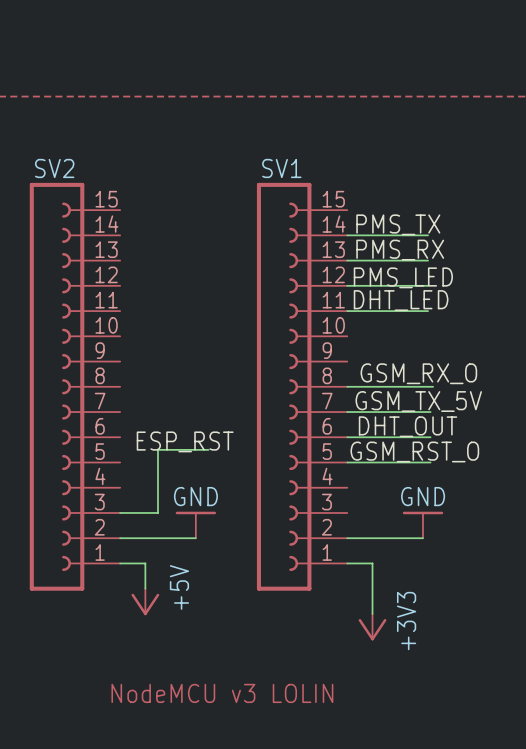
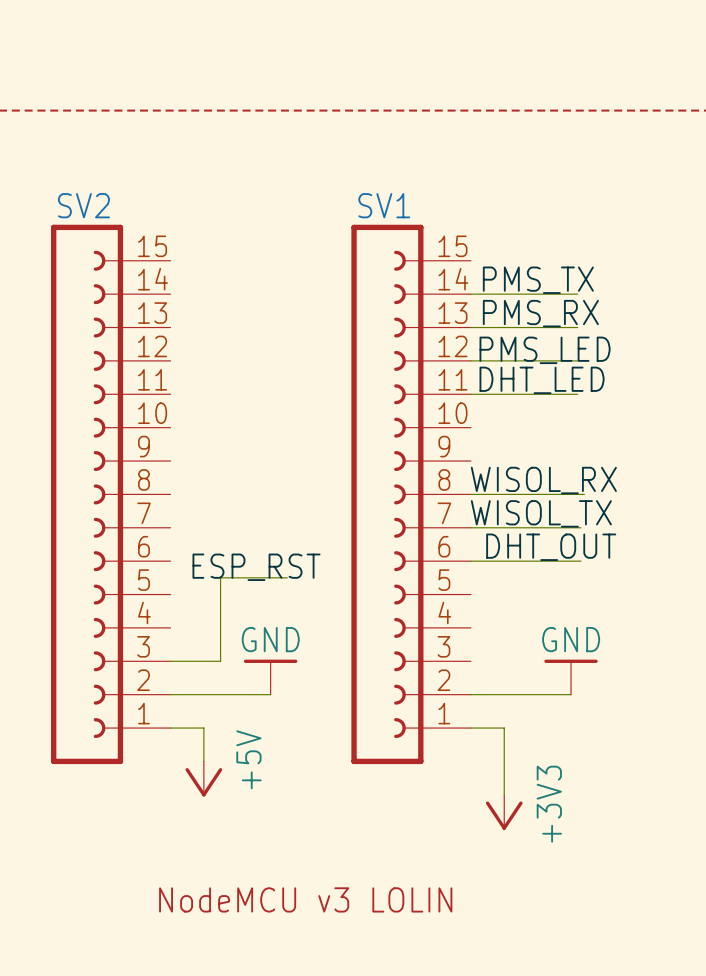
label: GSM_RX_O (418, 373) -> none
label: none -> WISOL_RX (543, 480)
label: GSM_TX_5V (418, 401) -> WISOL_TX (541, 513)
label: GSM_RST_O (414, 451) -> none
wire: (347, 462) (430, 462) -> none

